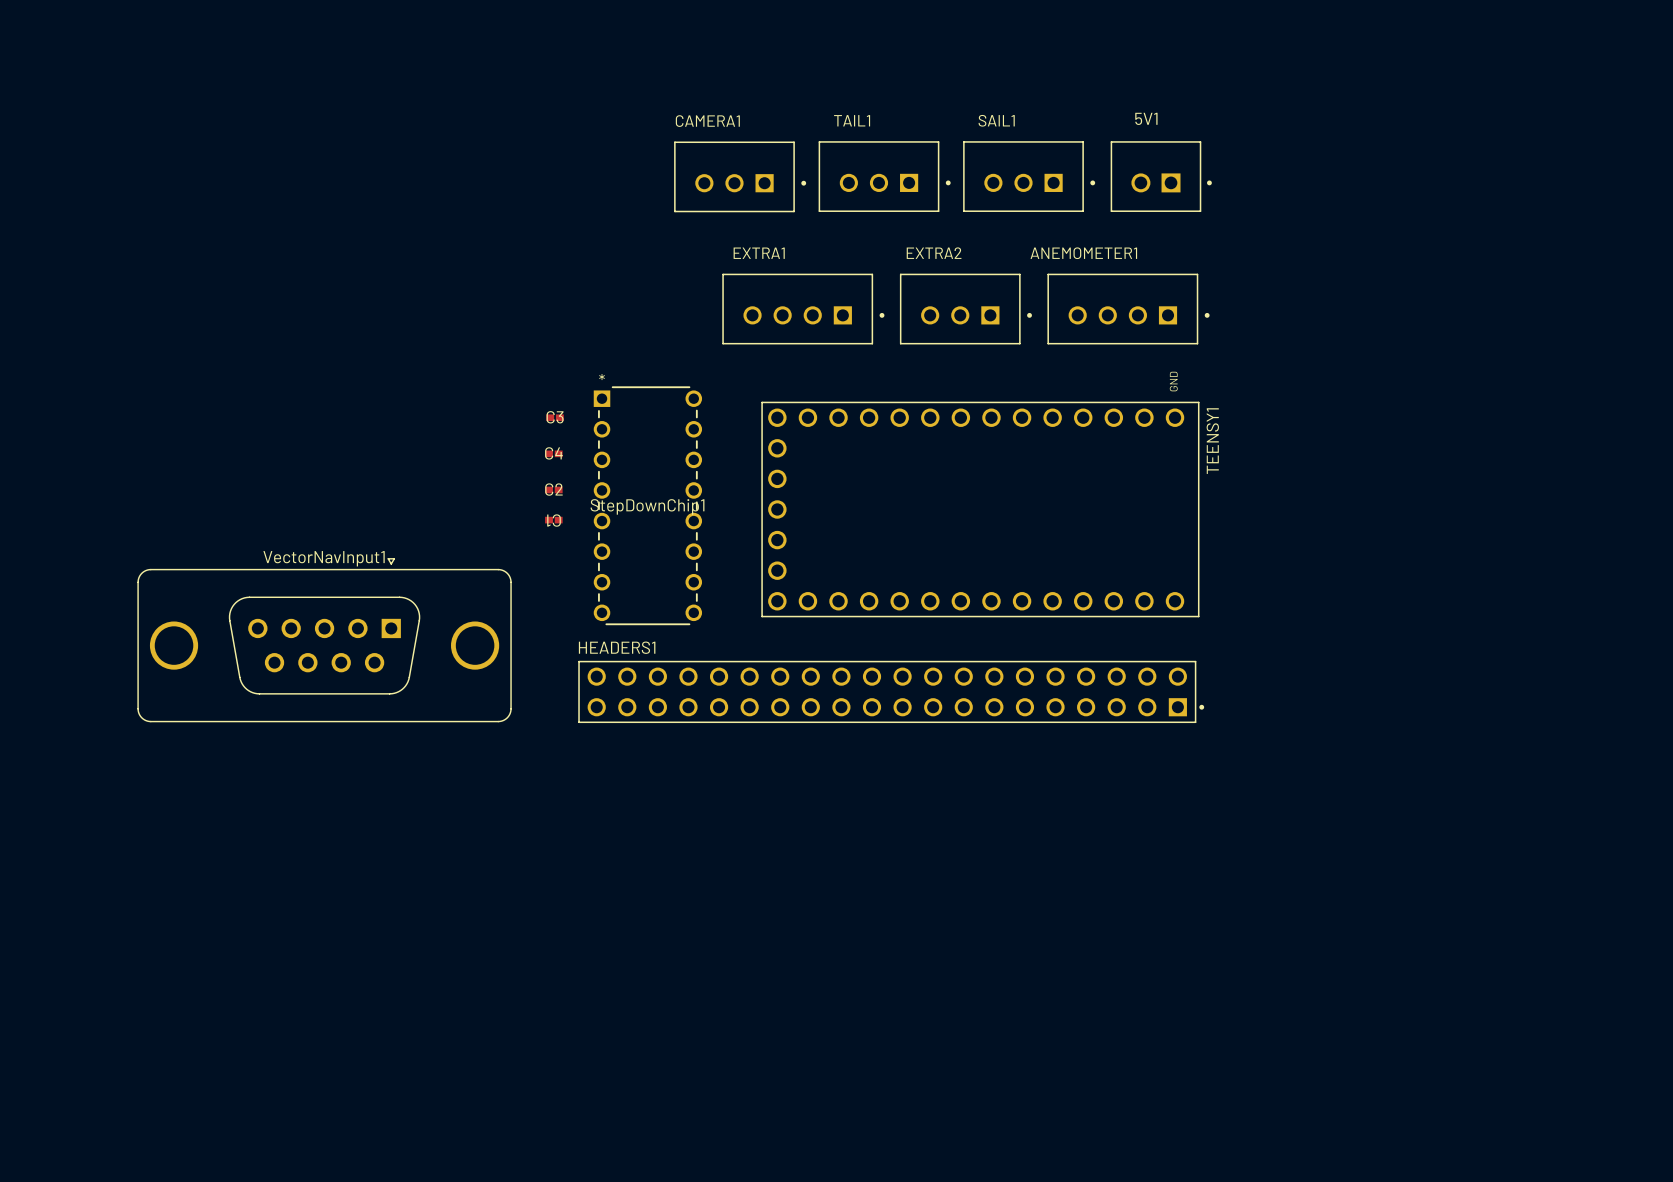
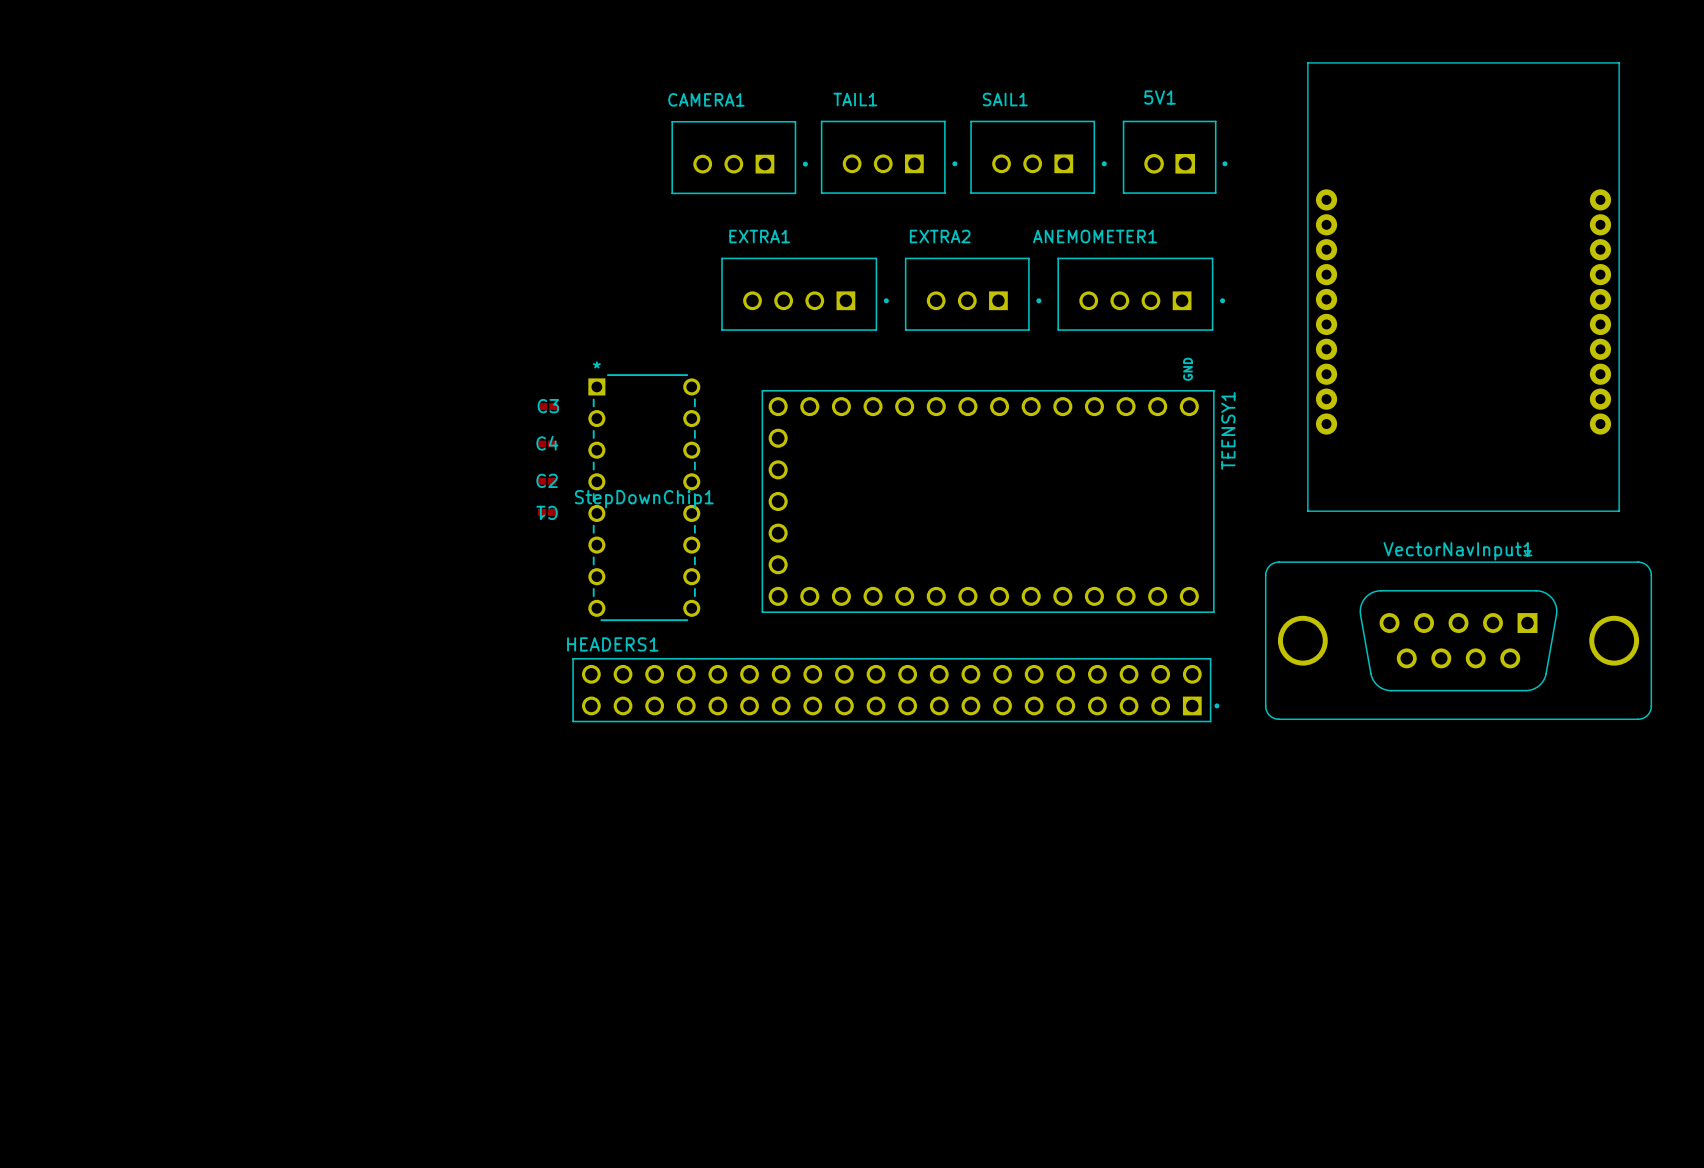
part: none -> (1463, 287)
VectorNavInput1 position: (324, 640) -> (1458, 635)

